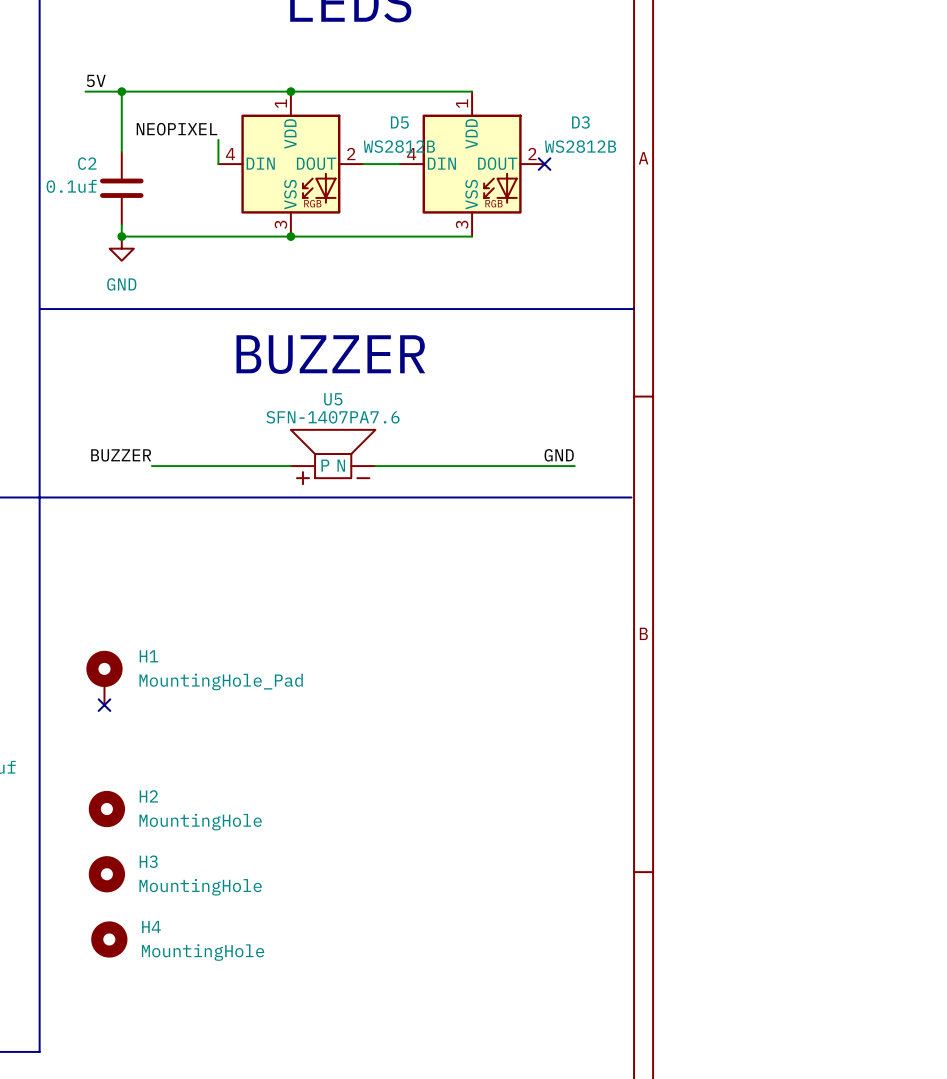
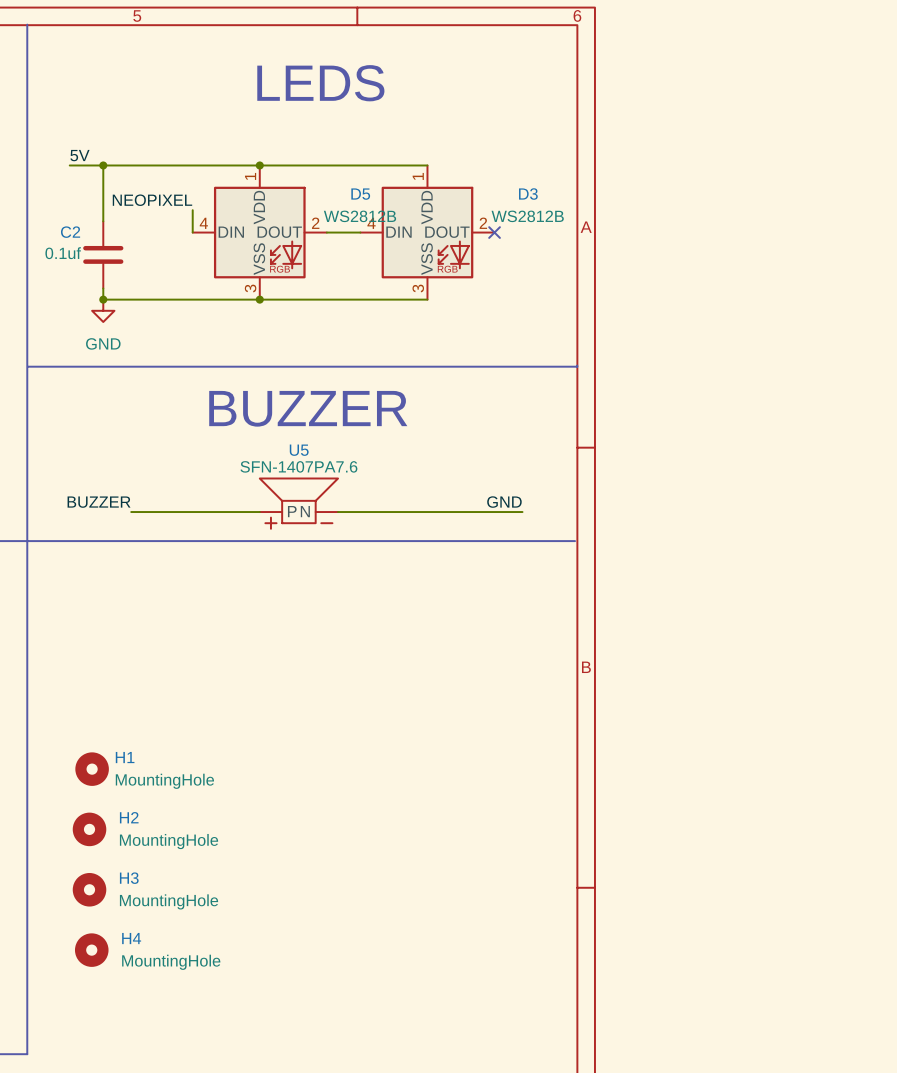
H1 symbol: [86, 650, 123, 706] -> [75, 752, 109, 786]
H1 value: MountingHole_Pad (221, 681) -> MountingHole (164, 781)
no-connect mark: (104, 705) -> none

